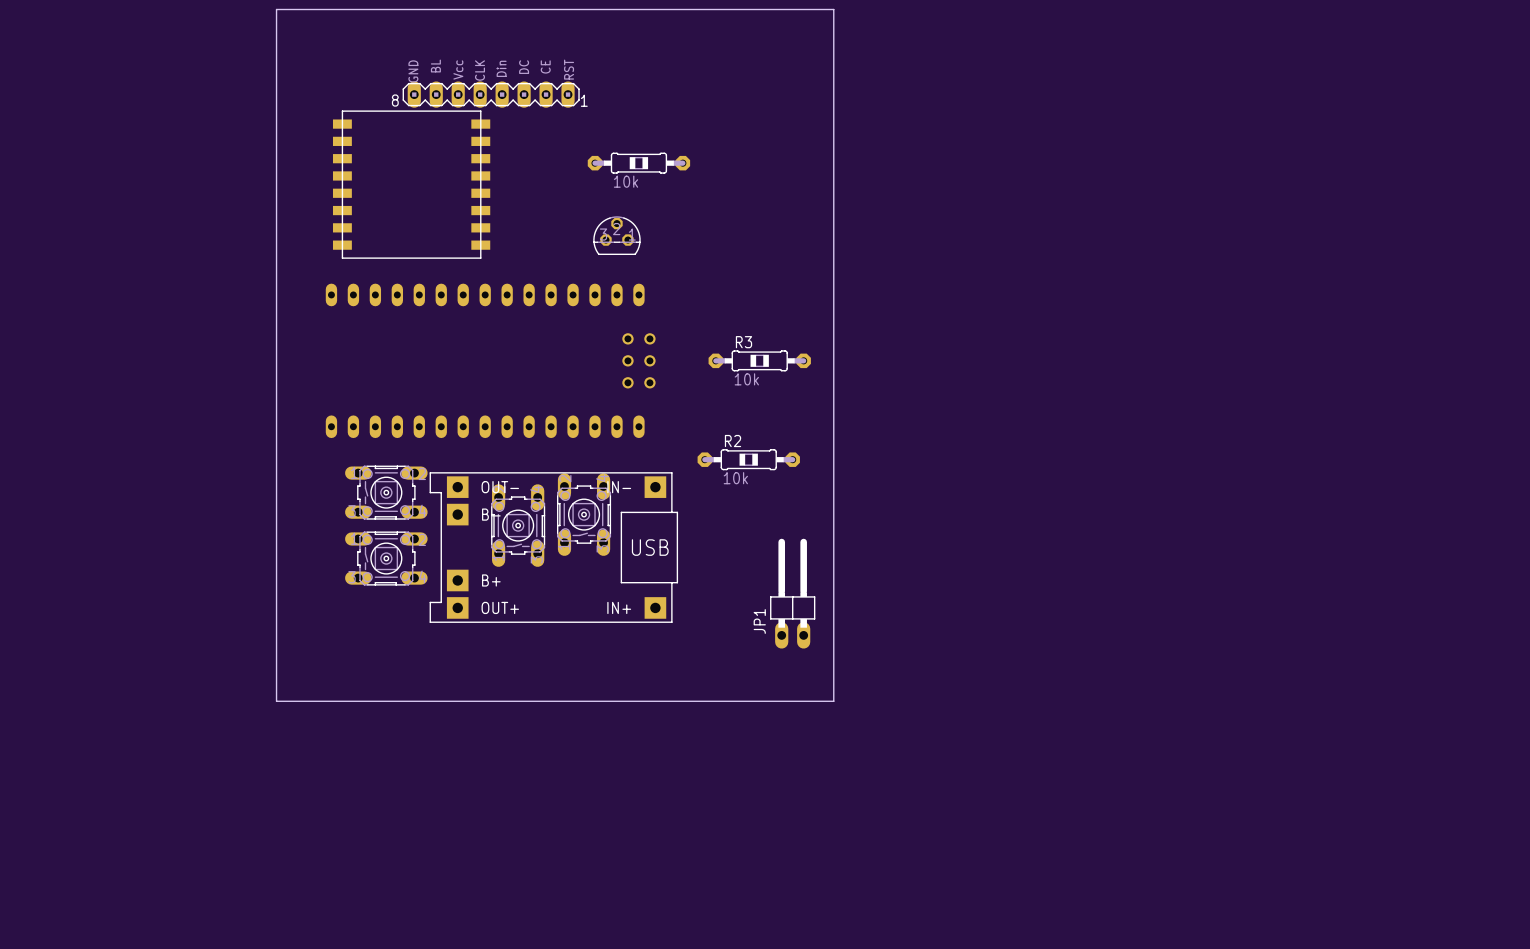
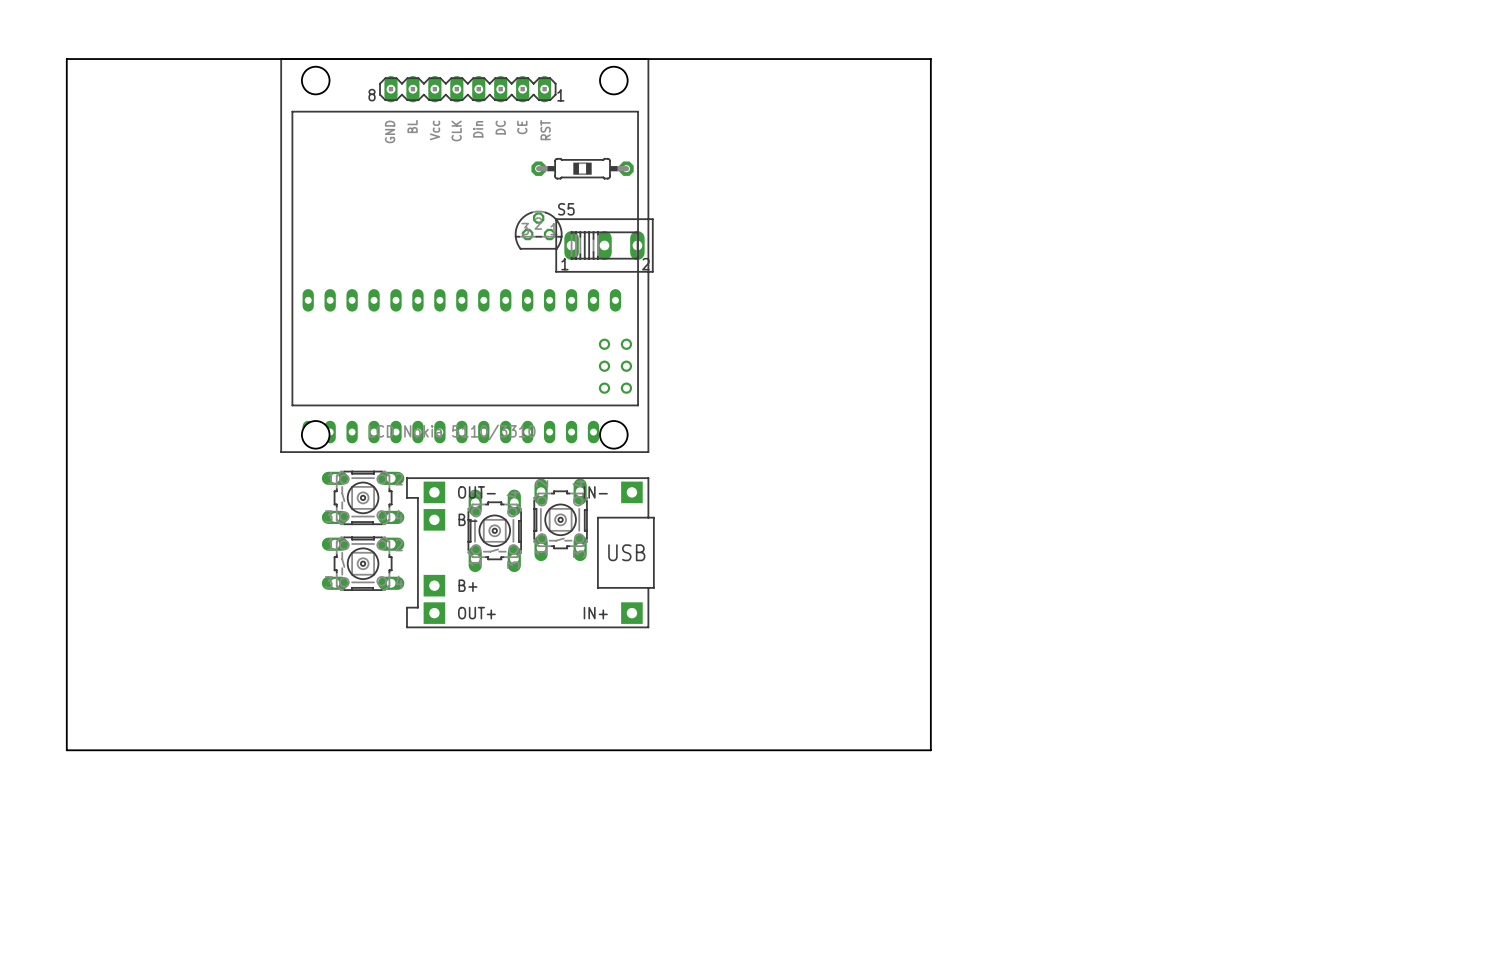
board edge: (276, 9) (833, 9) (833, 701) (276, 701) (276, 9) -> (66, 59) (66, 750) (930, 750) (930, 59) (66, 59)
part: (491, 94) -> none
part: none -> (582, 168)
part: 10k (638, 163) -> none
part: (411, 184) -> none
part position: (616, 235) -> (538, 230)
S5: none -> (604, 245)
part: none -> (464, 255)
R3: 10k (759, 360) -> none
R2: 10k (748, 459) -> none
JP1: (792, 593) -> none

